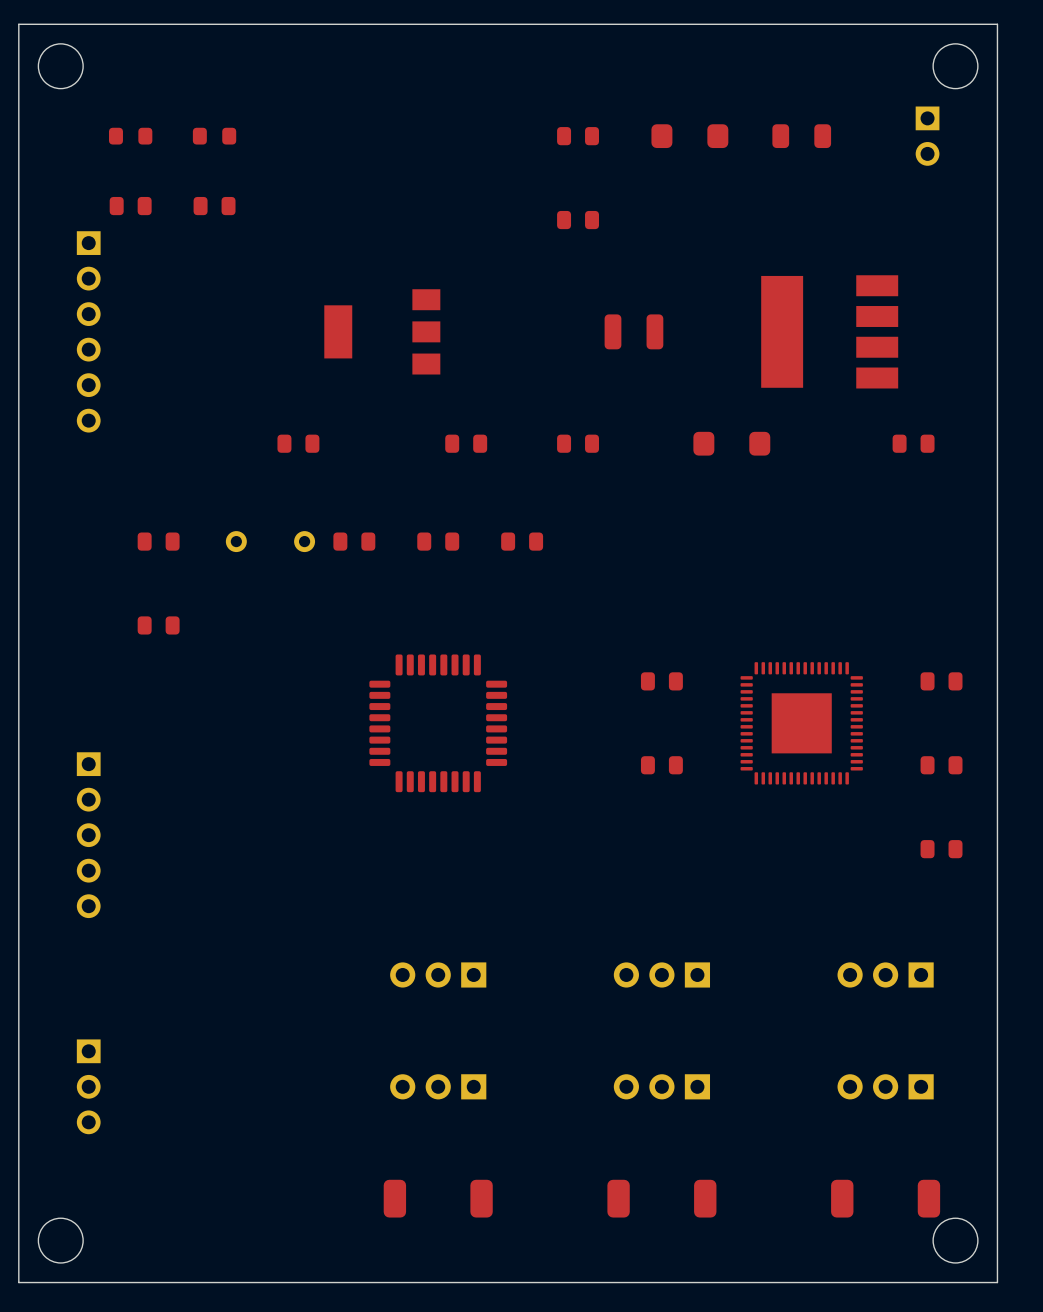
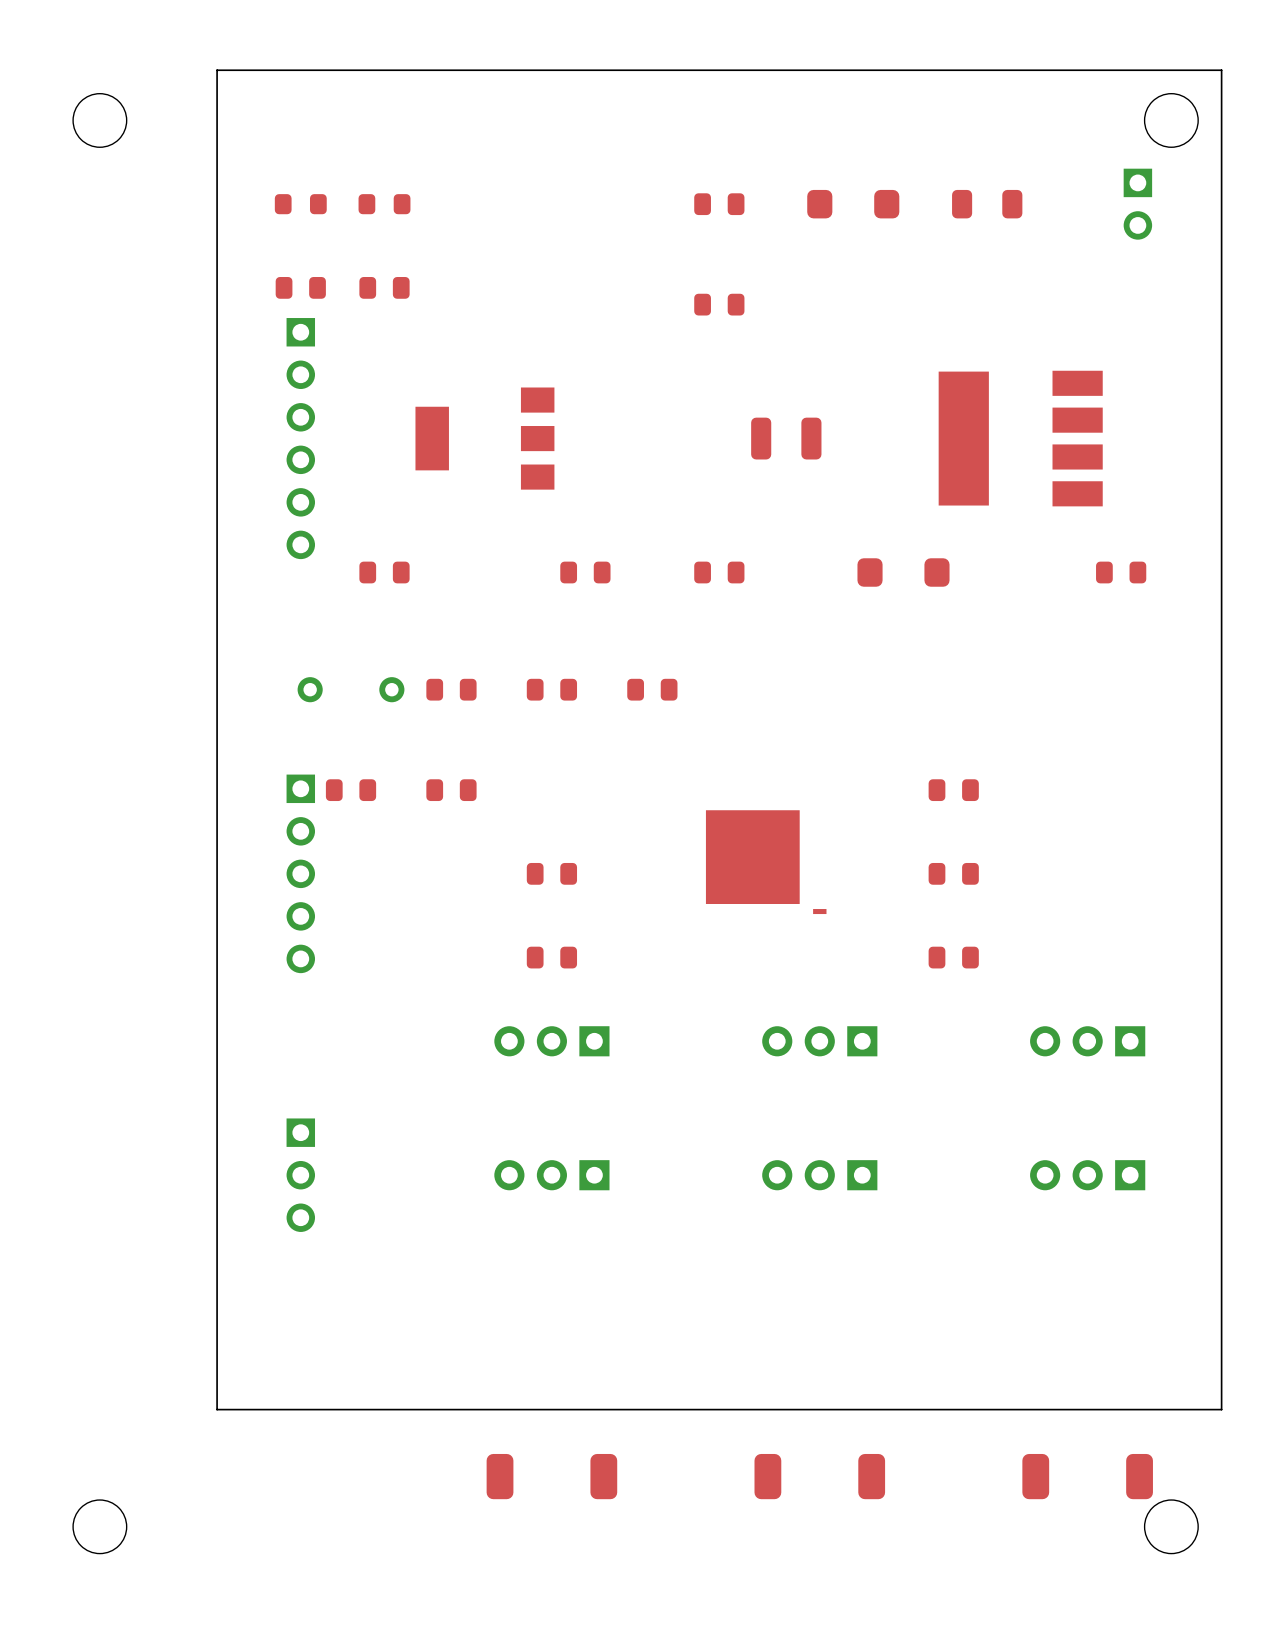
board edge: (158, 24) (18, 24) (18, 1282) (997, 1282) (997, 1142) -> (217, 70) (217, 1409) (1221, 1409)
part position: (130, 136) -> (384, 204)
part position: (214, 136) -> (300, 204)
part position: (130, 206) -> (384, 287)
part position: (214, 206) -> (300, 287)
part position: (88, 331) -> (300, 438)
part: (158, 541) -> none
part: (158, 625) -> none
part: none -> (351, 790)
part: none -> (451, 790)
part: none -> (953, 790)
part: (661, 681) -> none
part: (941, 681) -> none
part: none -> (766, 862)
part: none -> (551, 873)
part: none -> (953, 873)
part: (438, 723) -> none
part: (801, 723) -> none
part: none -> (551, 957)
part: (661, 765) -> none
part: none -> (953, 957)
part: (941, 765) -> none
part position: (88, 835) -> (300, 873)
part: none -> (551, 1041)
part: none -> (819, 1041)
part: none -> (1087, 1041)
part: (941, 849) -> none
part position: (438, 974) -> (551, 1175)
part position: (661, 974) -> (819, 1175)
part position: (885, 974) -> (1087, 1175)
part position: (88, 1086) -> (300, 1175)
part: (438, 1086) -> none
part: (661, 1086) -> none
part: (885, 1086) -> none

